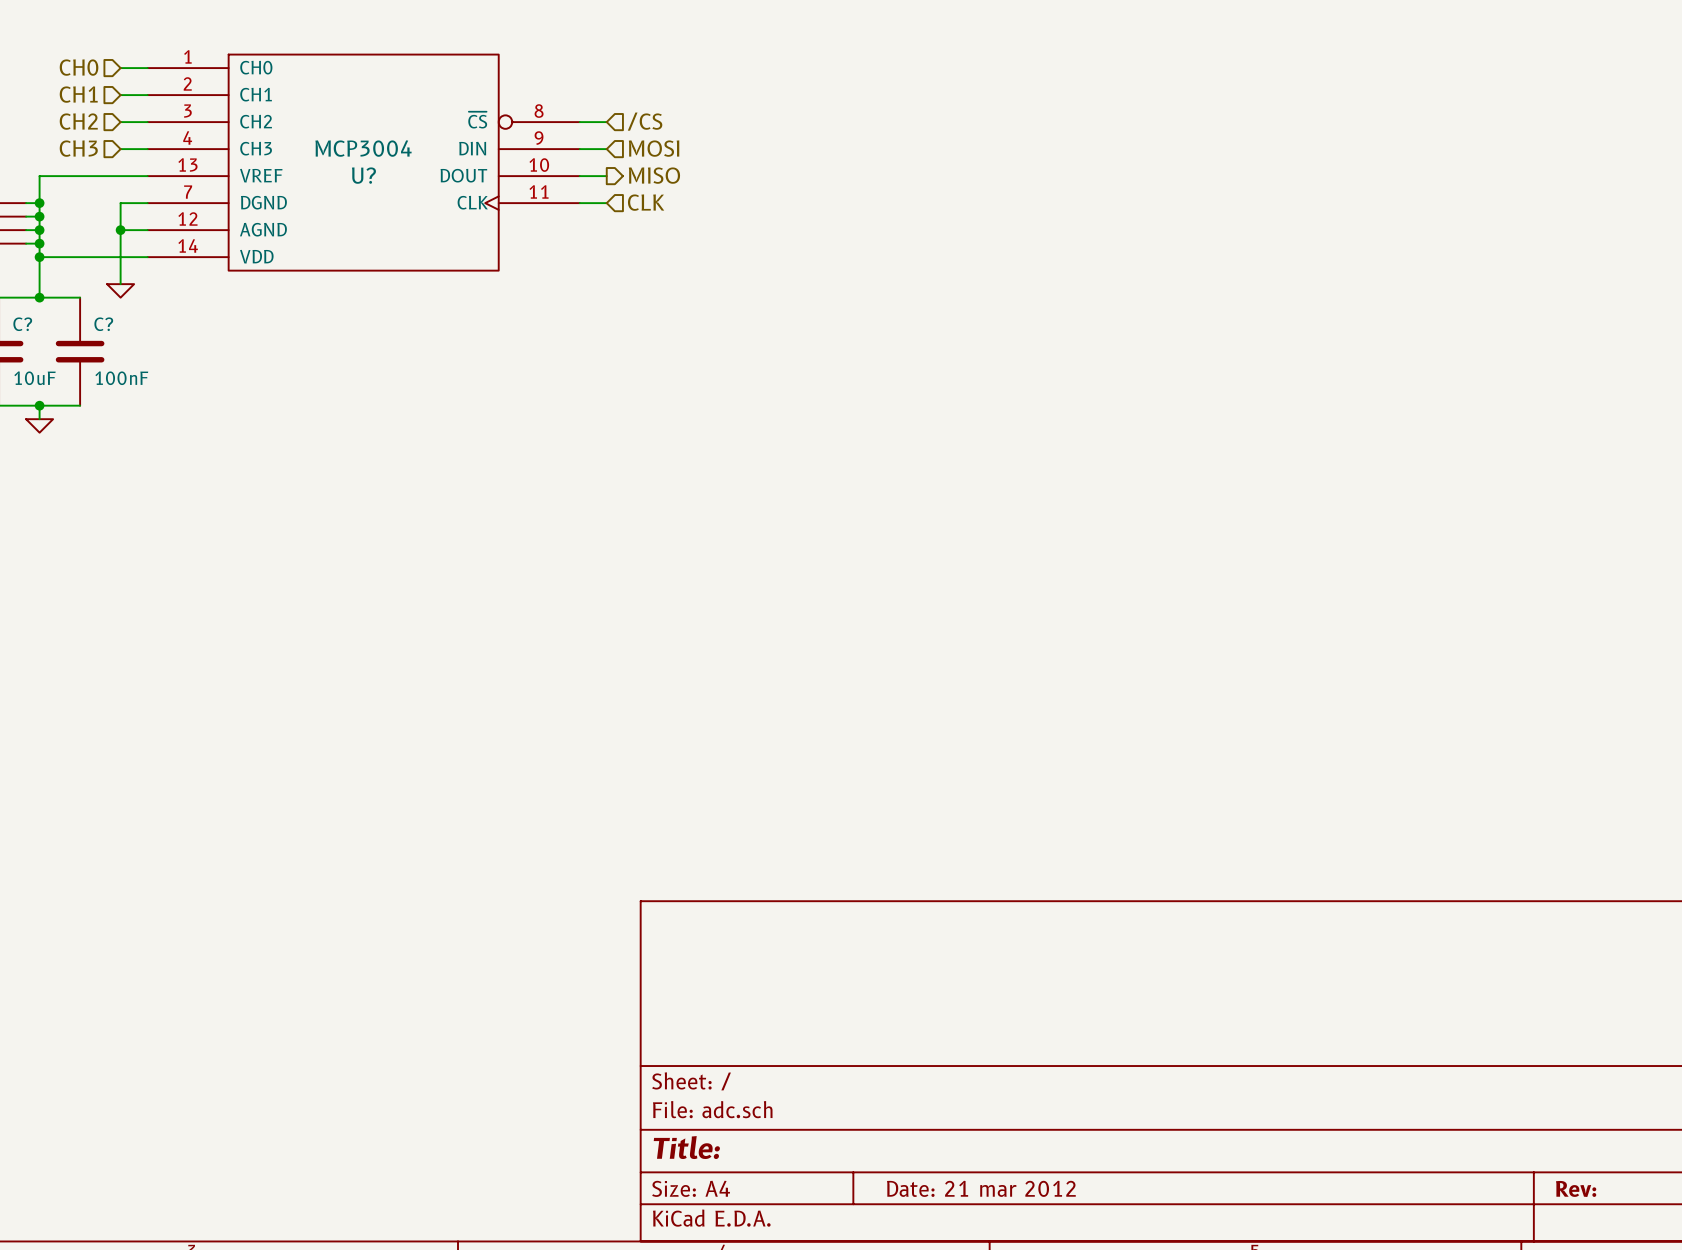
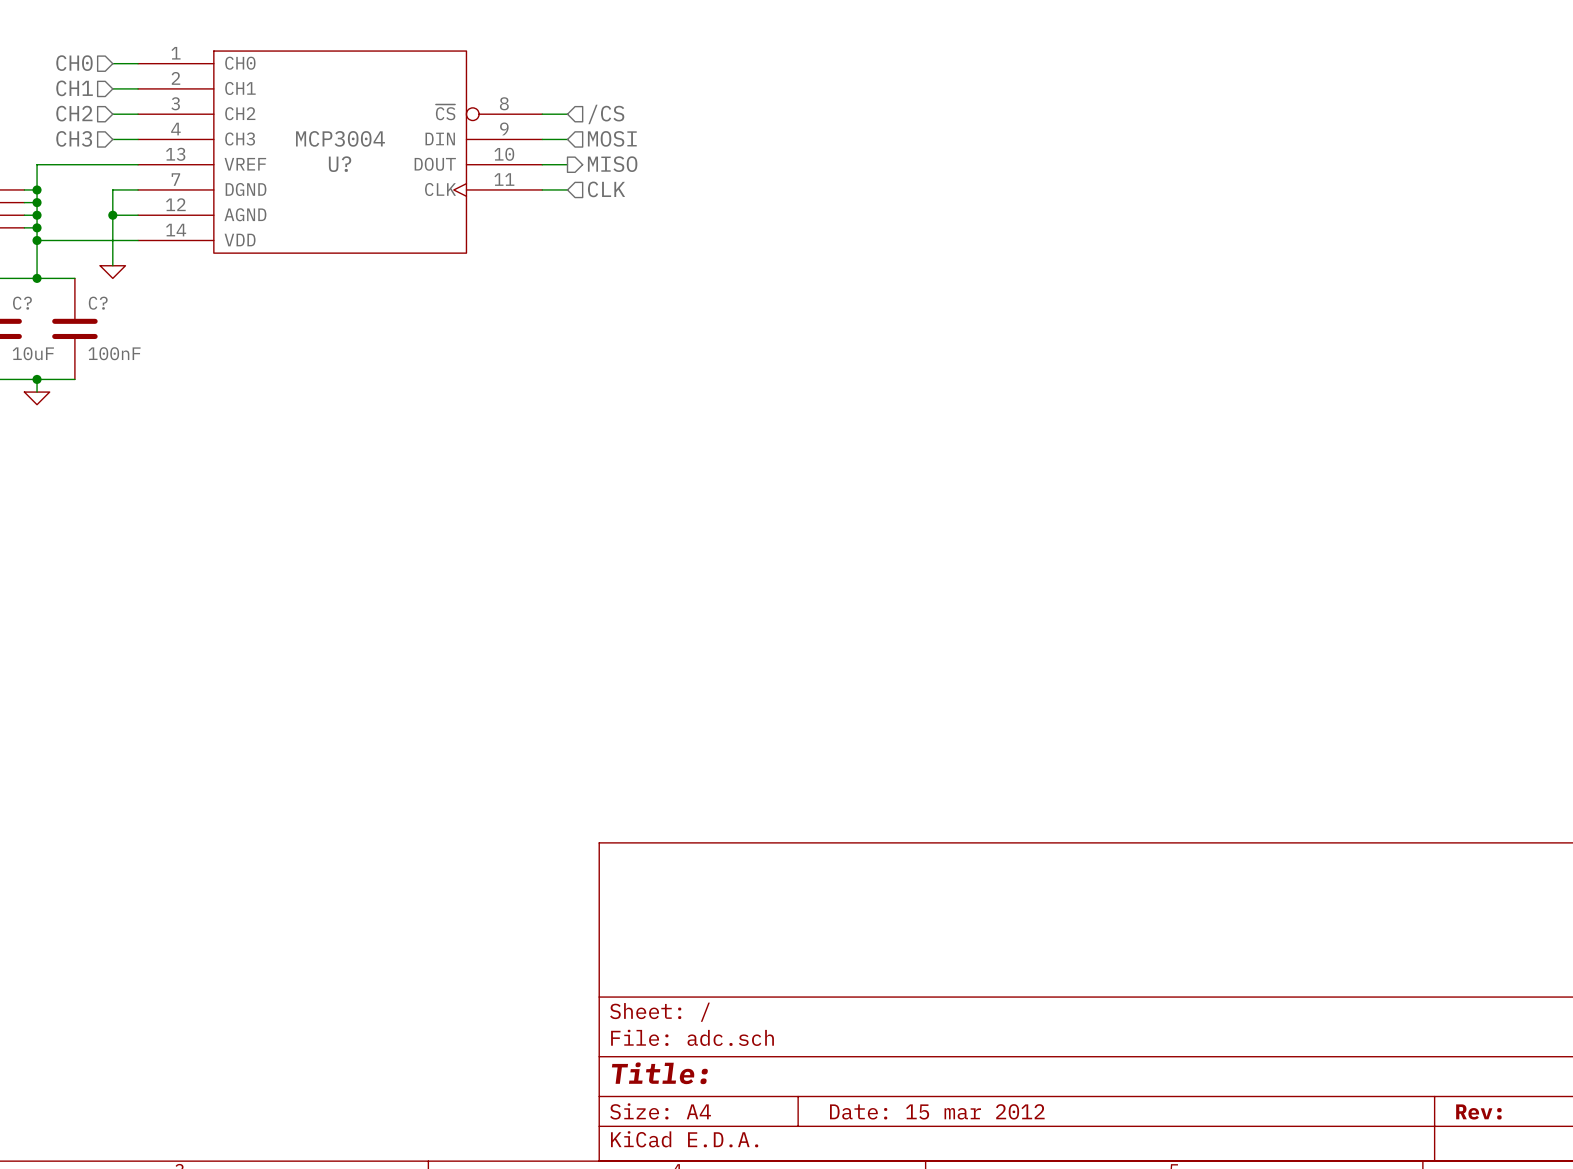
title block: Date: 21 mar 2012 (981, 1188) -> Date: 15 mar 2012 (937, 1111)

